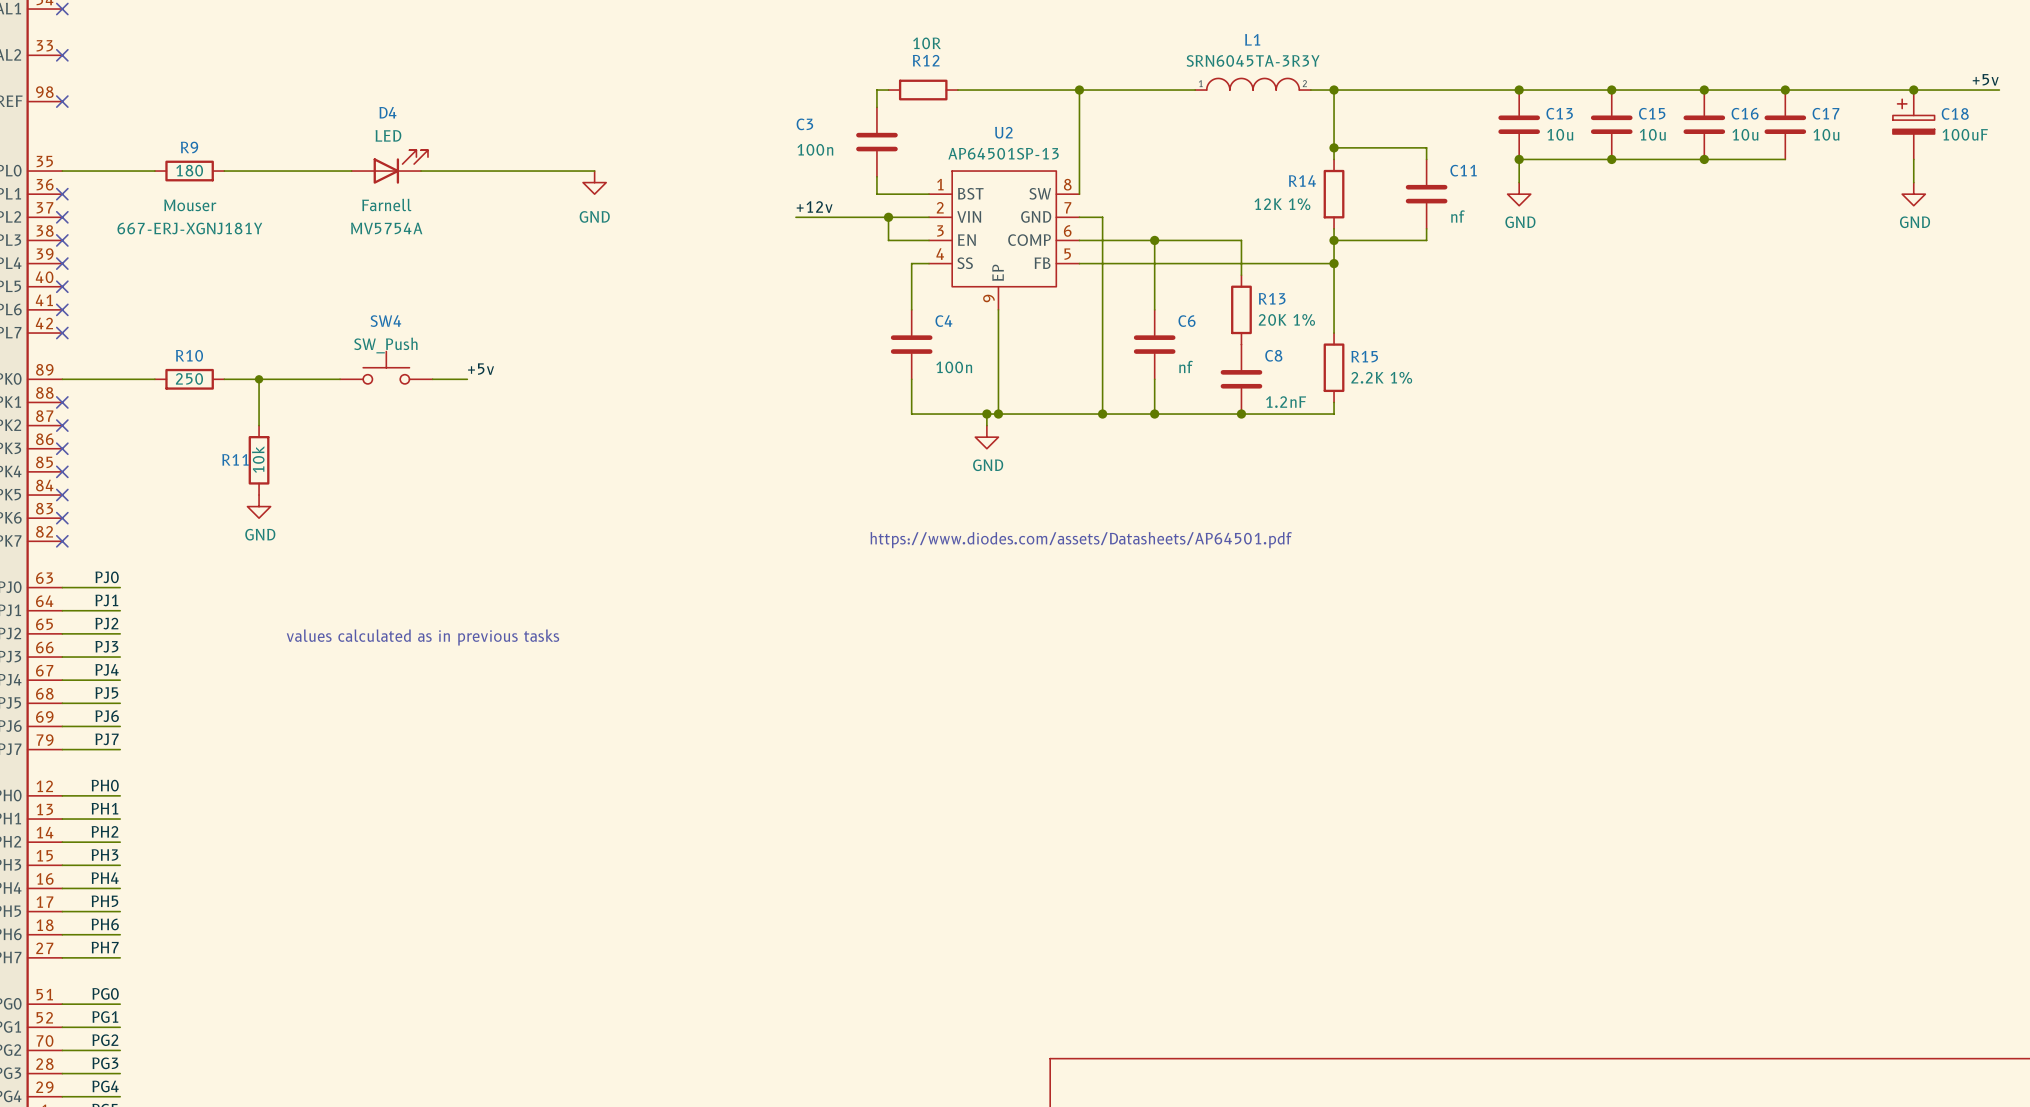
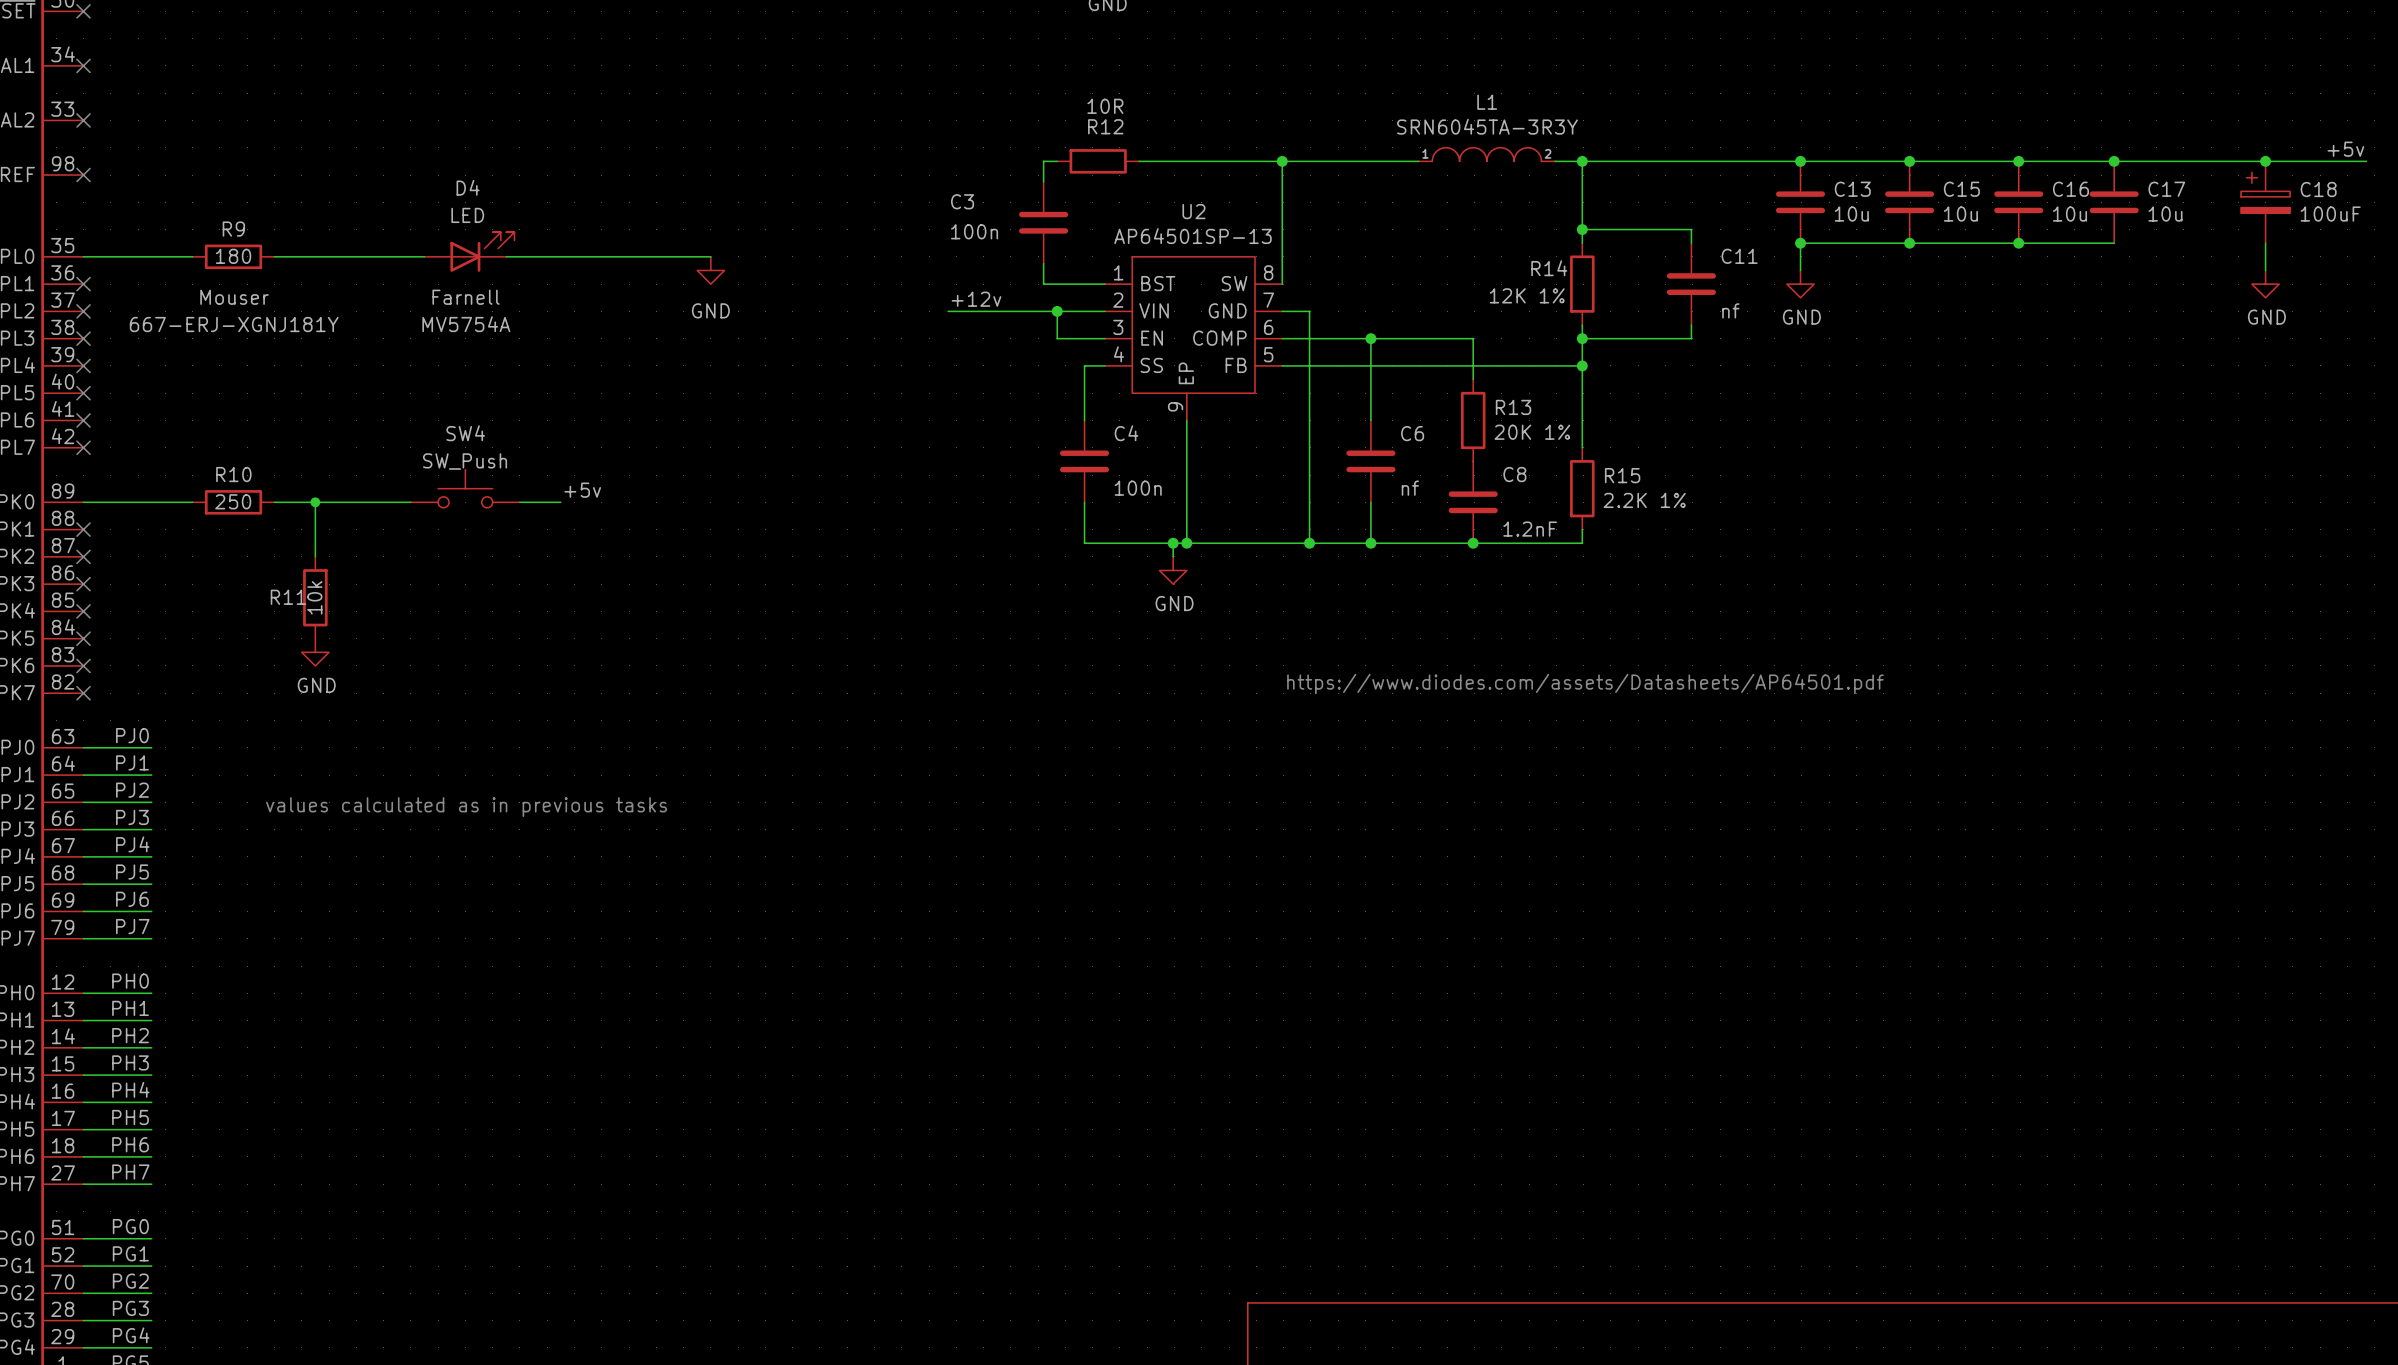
text position: https://www.diodes.com/assets/Datasheets/AP64501.pdf (1081, 540) -> https://www.diodes.com/assets/Datasheets/AP64501.pdf (1585, 684)

